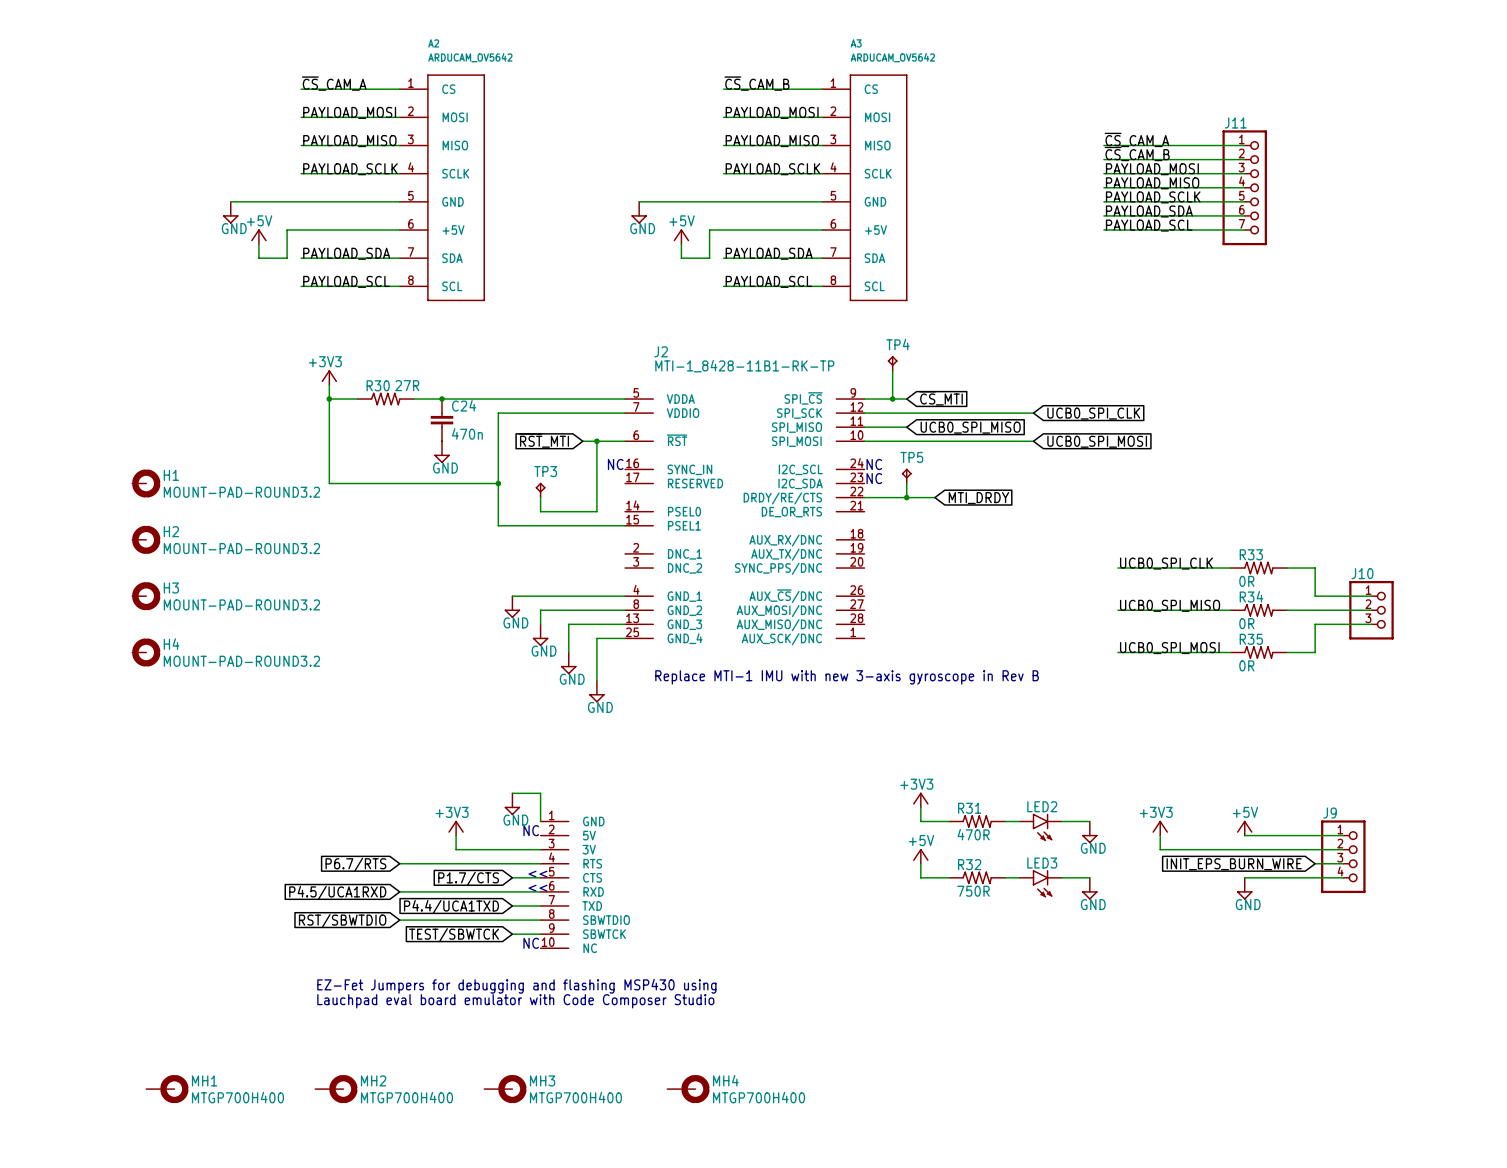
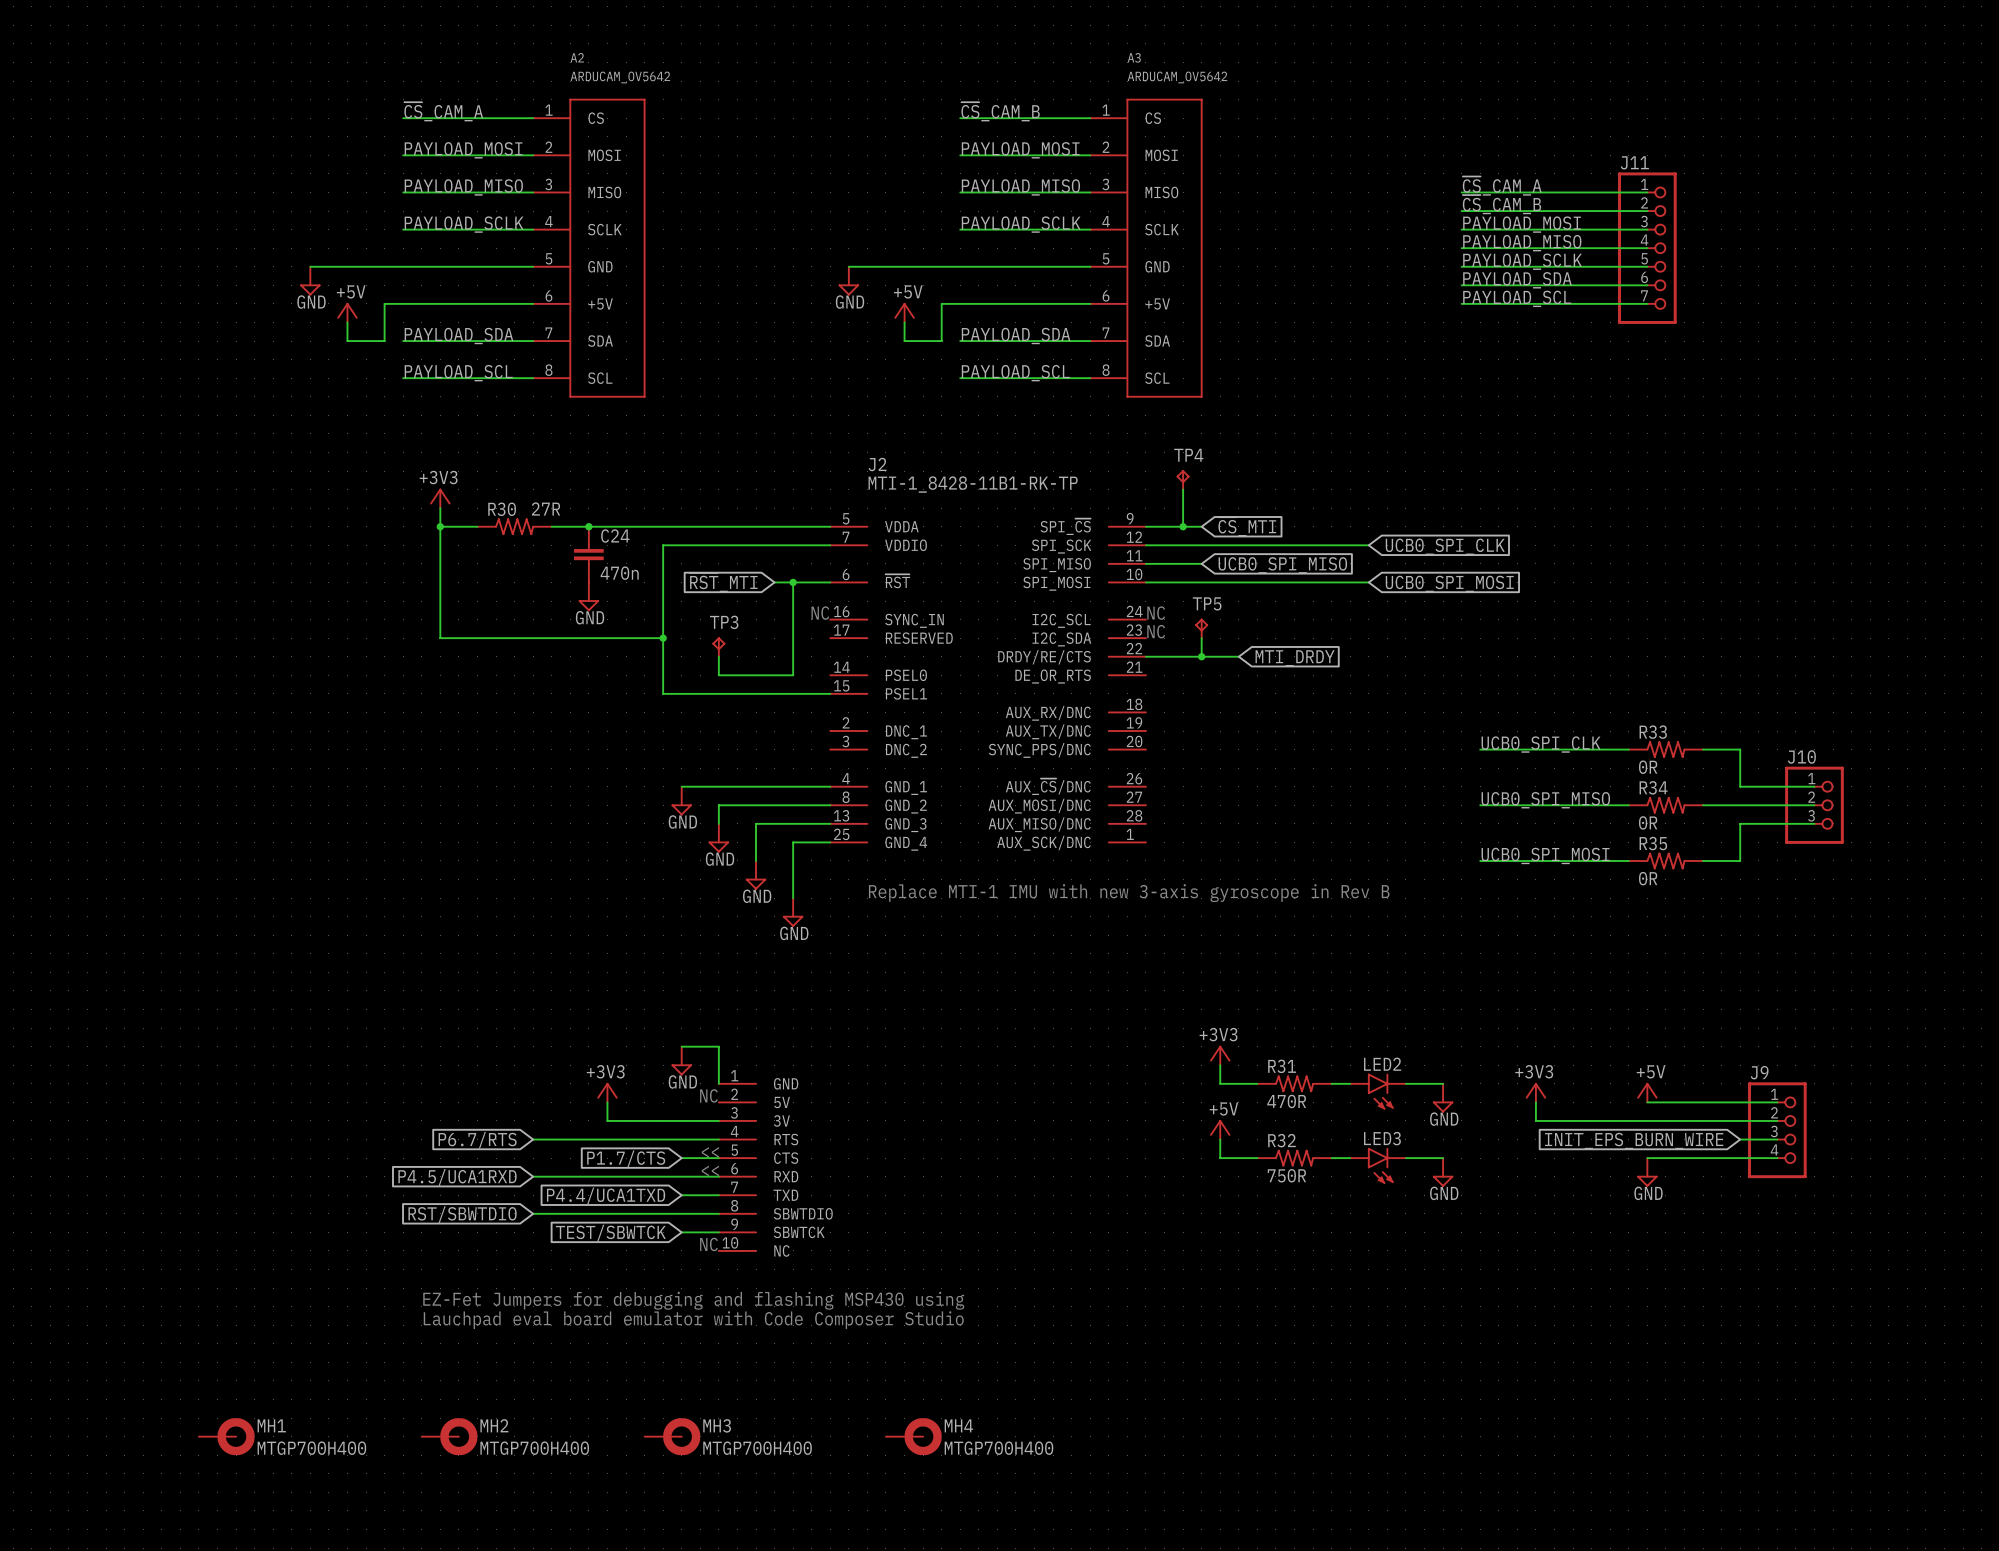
H1: MOUNT-PAD-ROUND3.2 (146, 483) -> none
H2: MOUNT-PAD-ROUND3.2 (146, 539) -> none
H3: MOUNT-PAD-ROUND3.2 (146, 596) -> none
H4: MOUNT-PAD-ROUND3.2 (146, 652) -> none

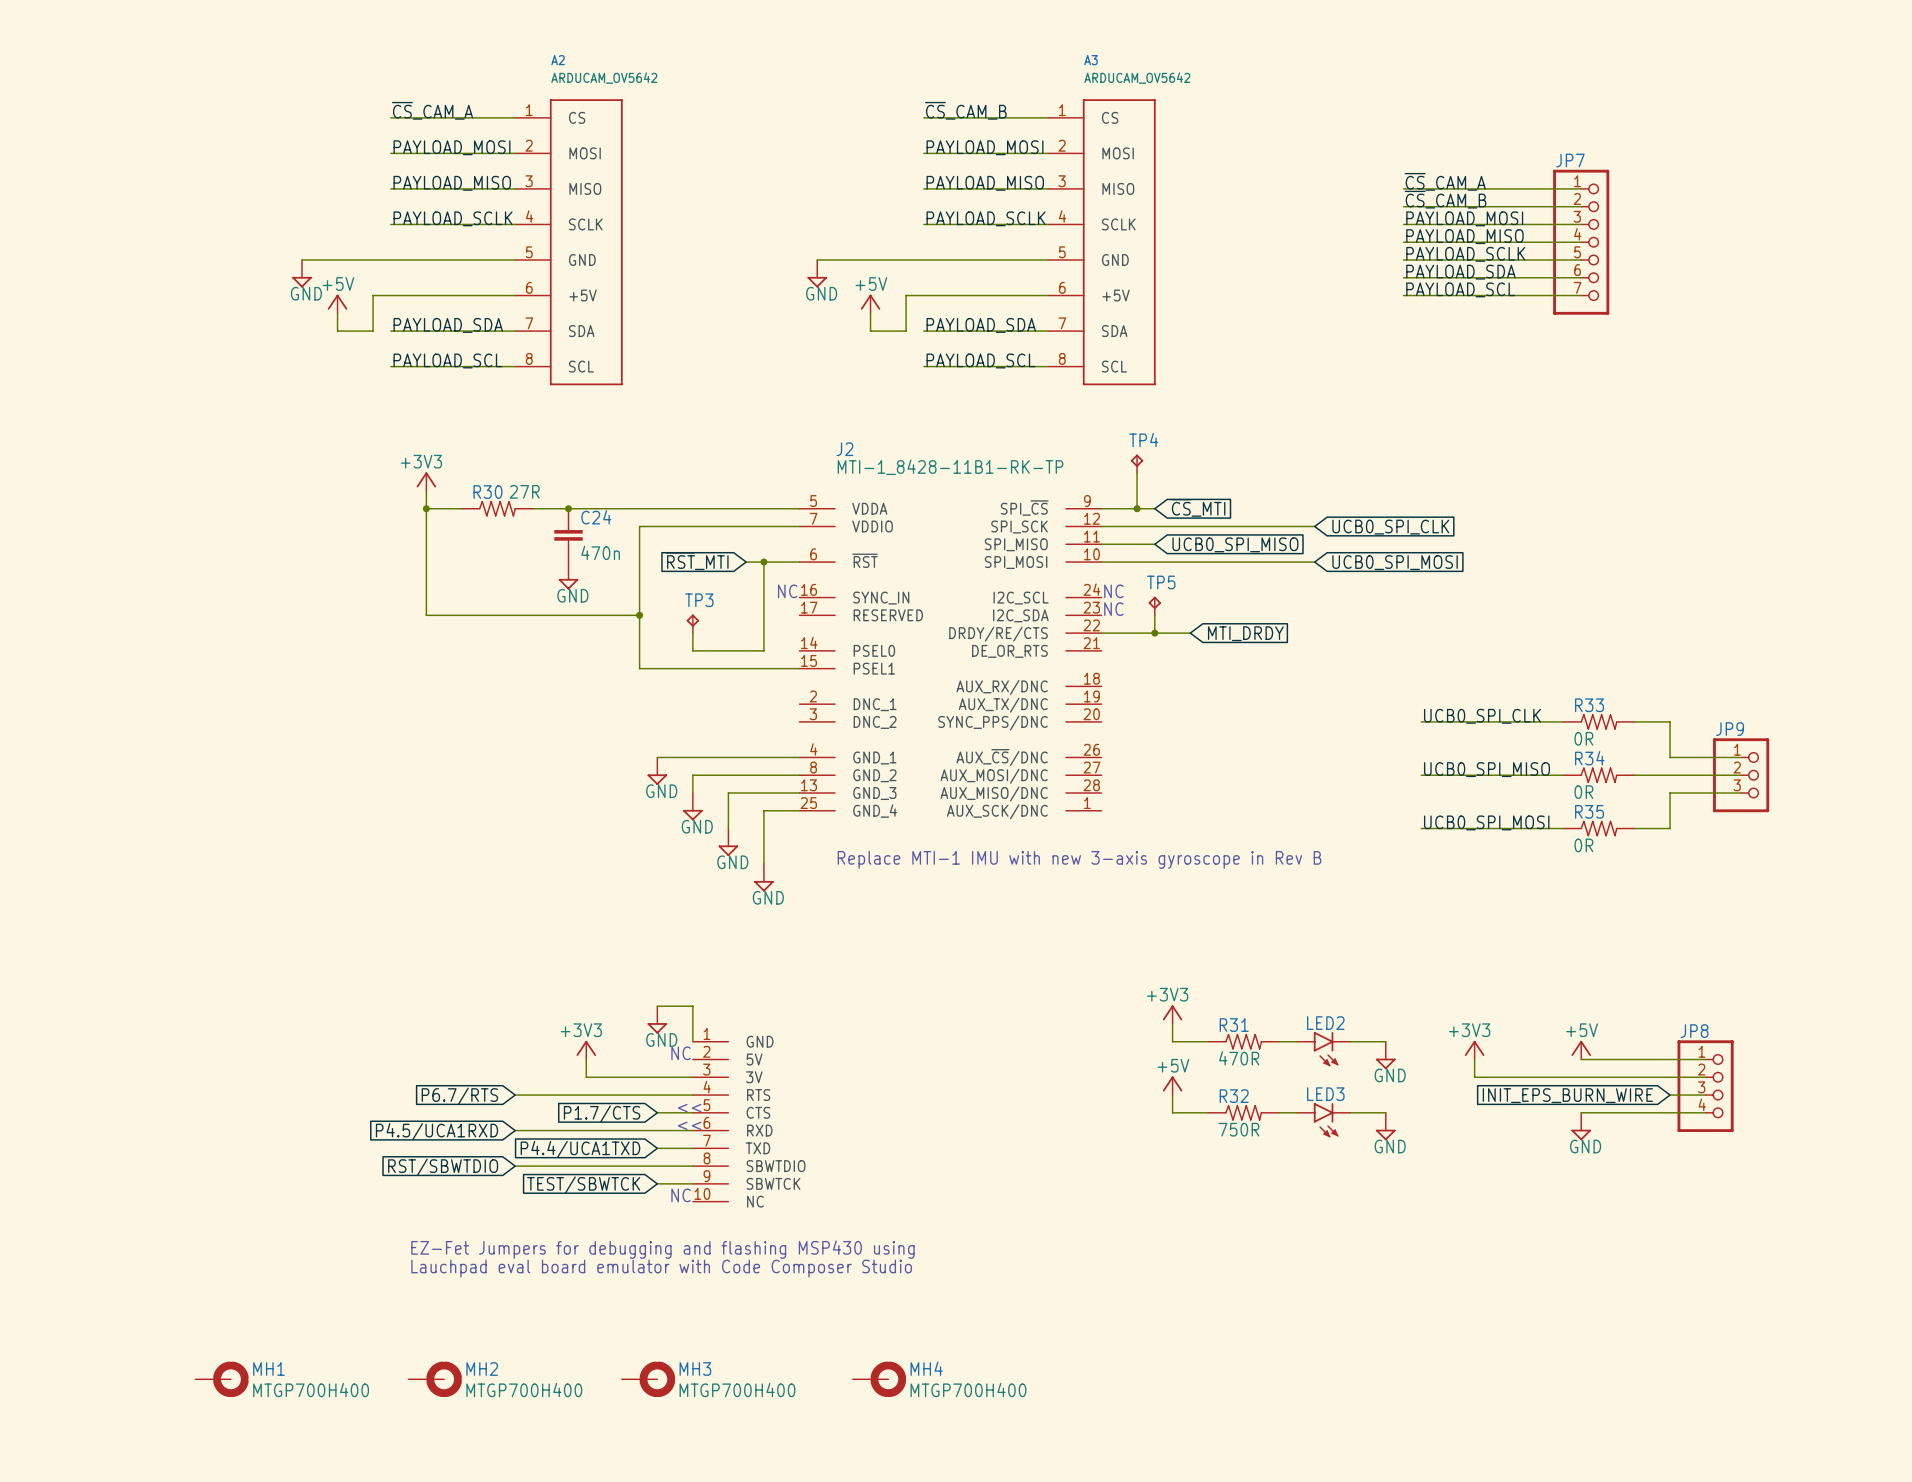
J11 name: J11 (1634, 162) -> JP7 (1570, 160)
J10 name: J10 (1801, 757) -> JP9 (1730, 729)
J9 name: J9 (1759, 1072) -> JP8 (1694, 1031)

